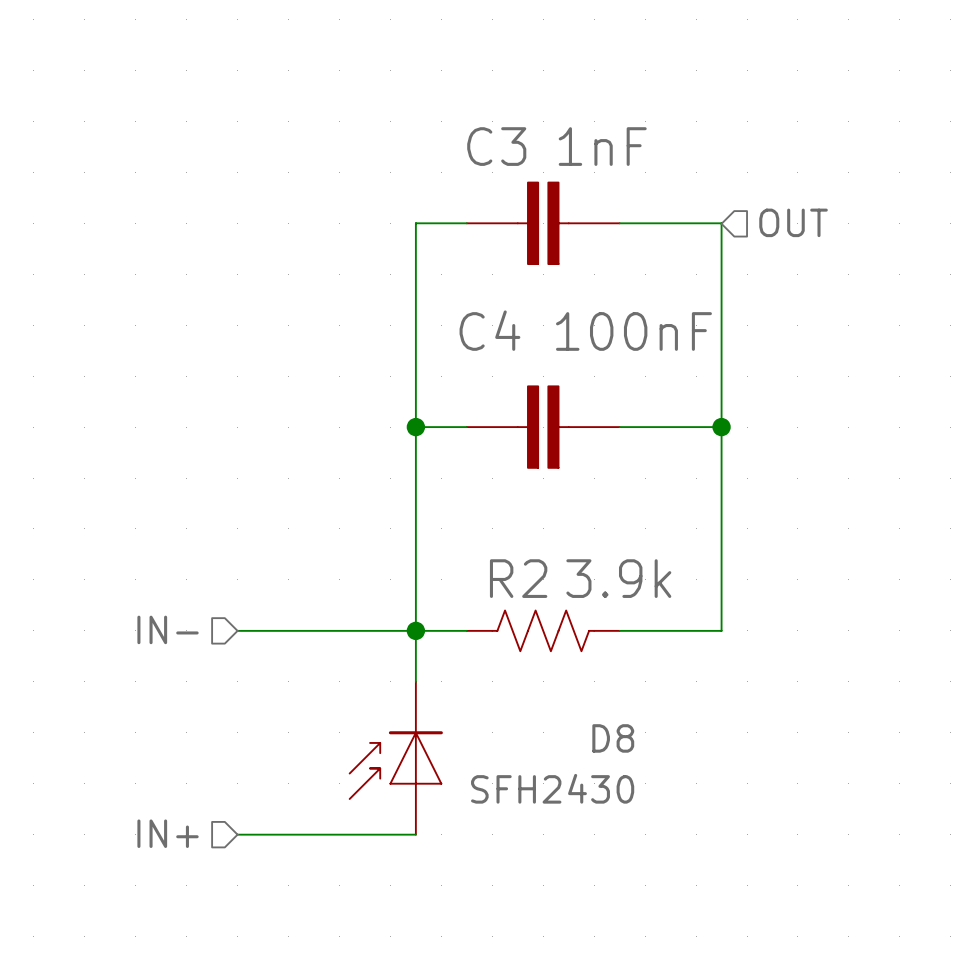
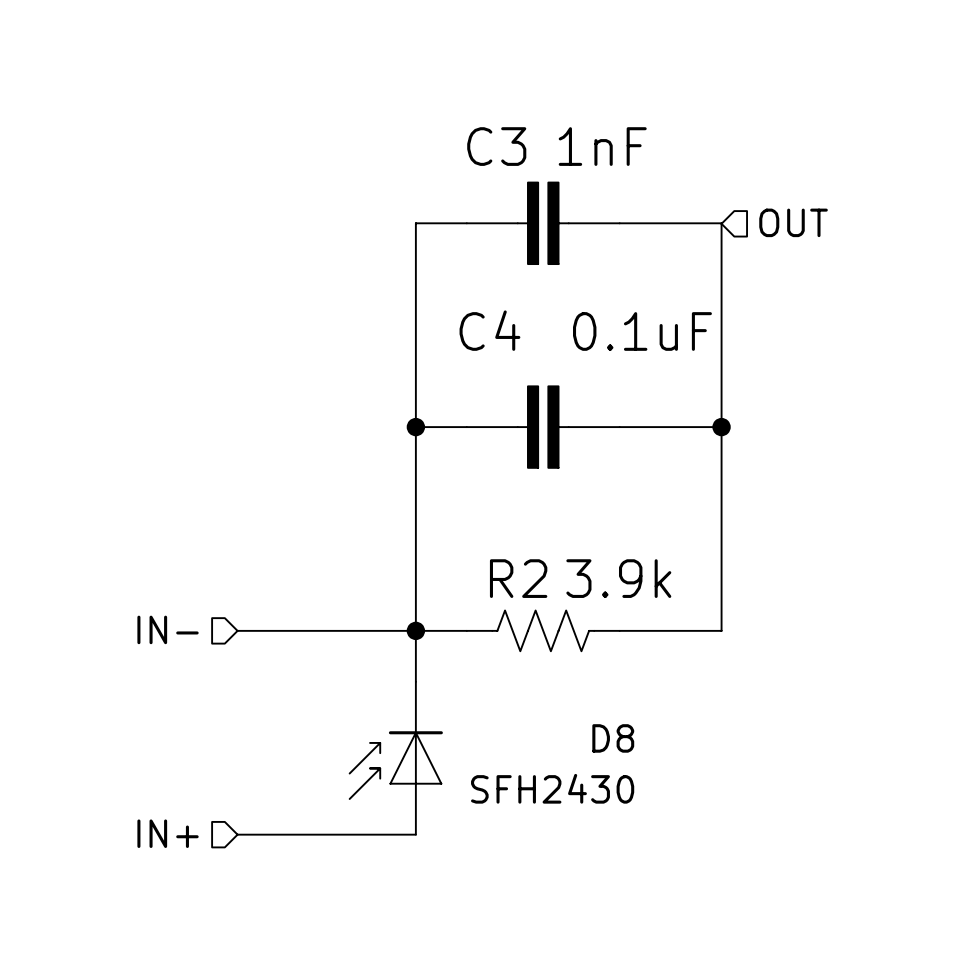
C4 value: 100nF (633, 331) -> 0.1uF (642, 331)

